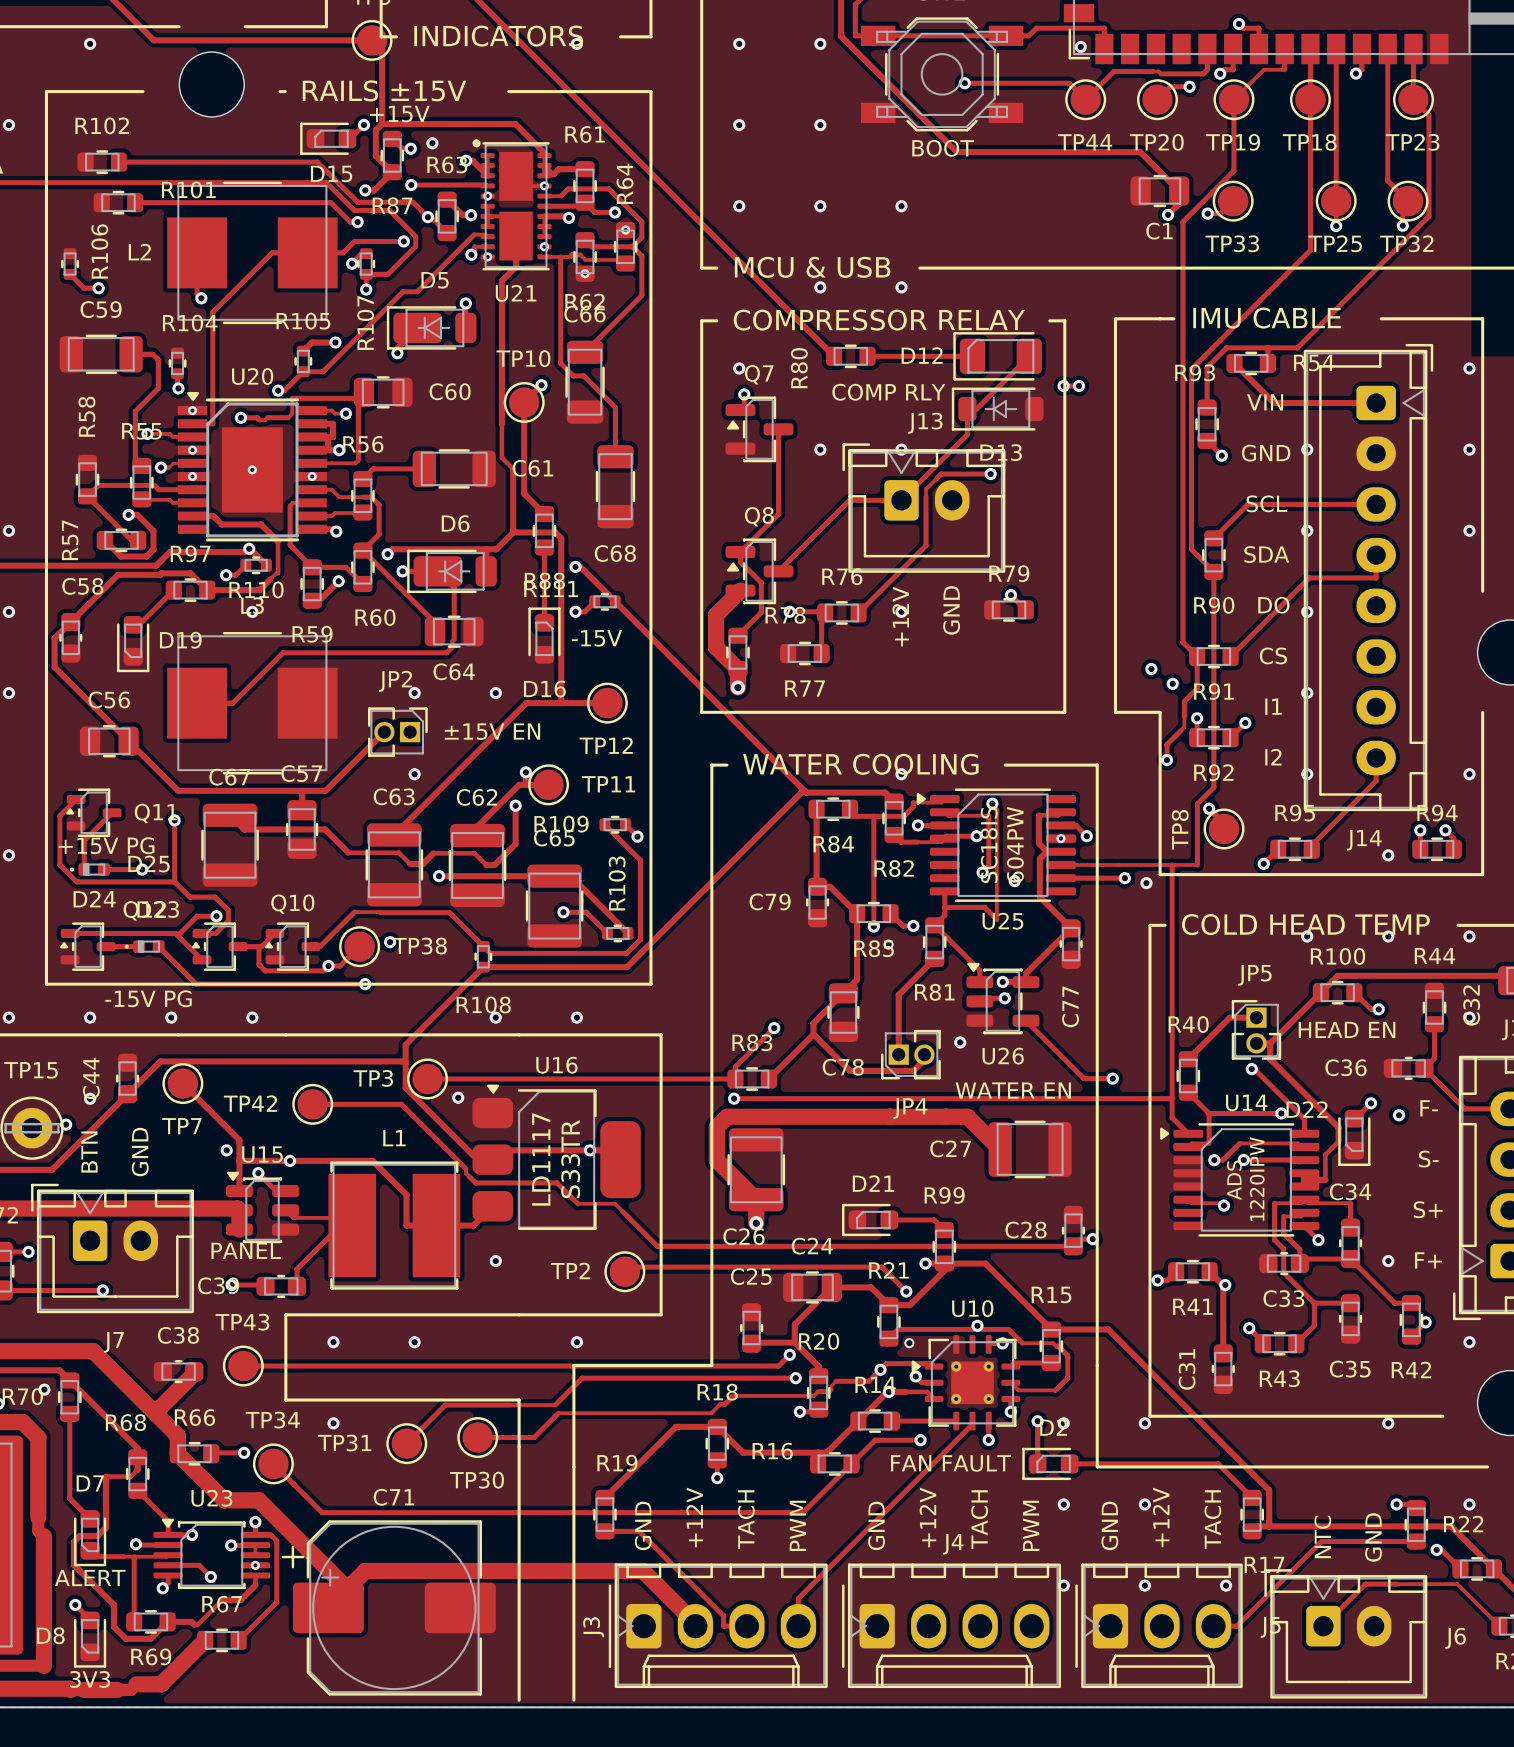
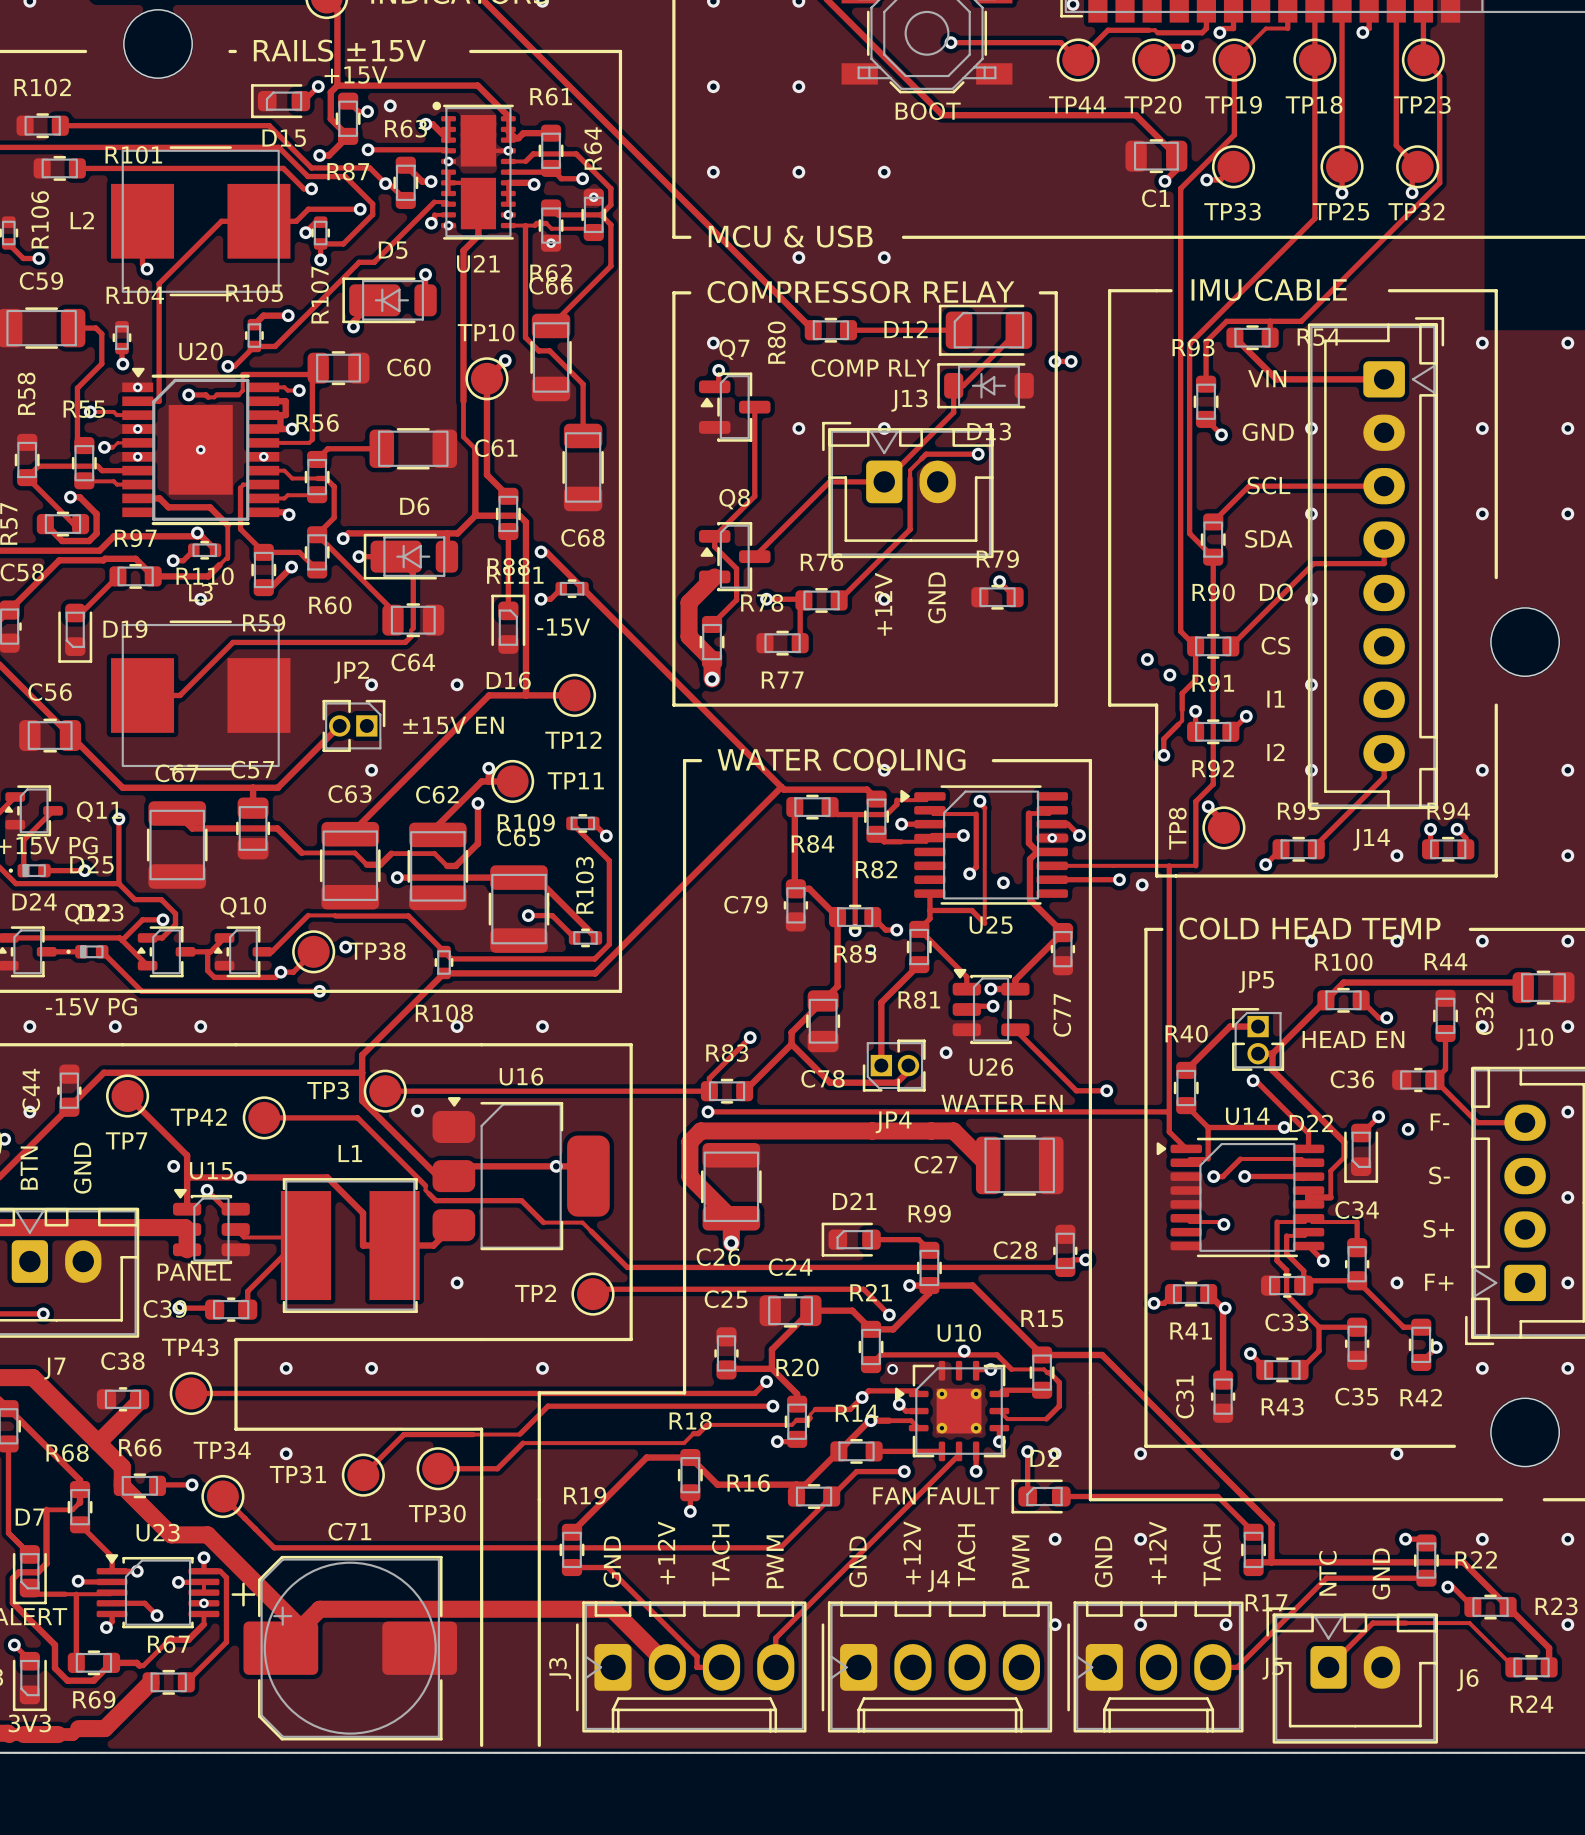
text: 604PW (1015, 844) -> none
text: SC18IS (989, 845) -> none
text: LD1117 (541, 1159) -> none
text: S33TR (570, 1159) -> none
text: 1220IPW (1257, 1179) -> none
text: ADS (1234, 1180) -> none

